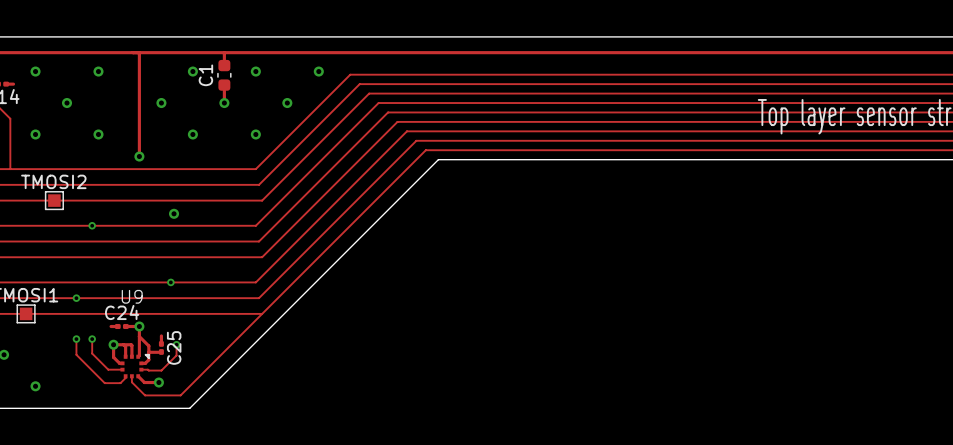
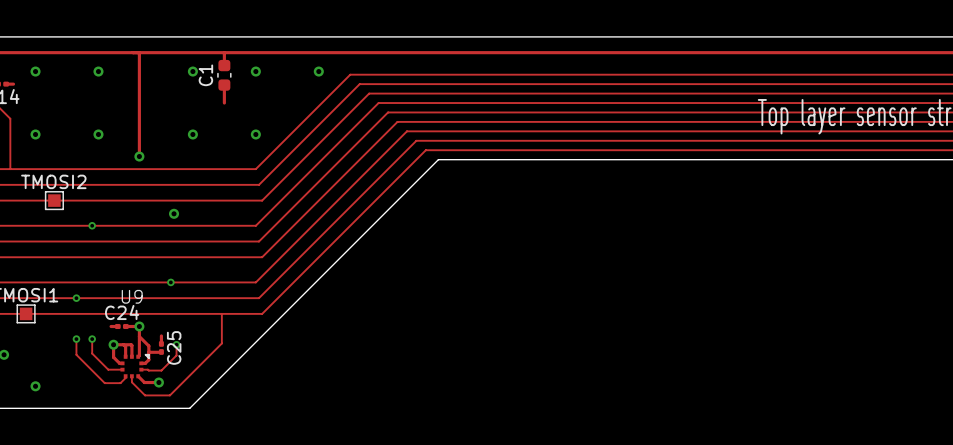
via: (67, 103) -> none
via: (161, 103) -> none
via: (224, 103) -> none
via: (287, 103) -> none
track: (262, 313) (180, 395) (169, 395) -> (221, 313) (221, 343) (169, 395)

